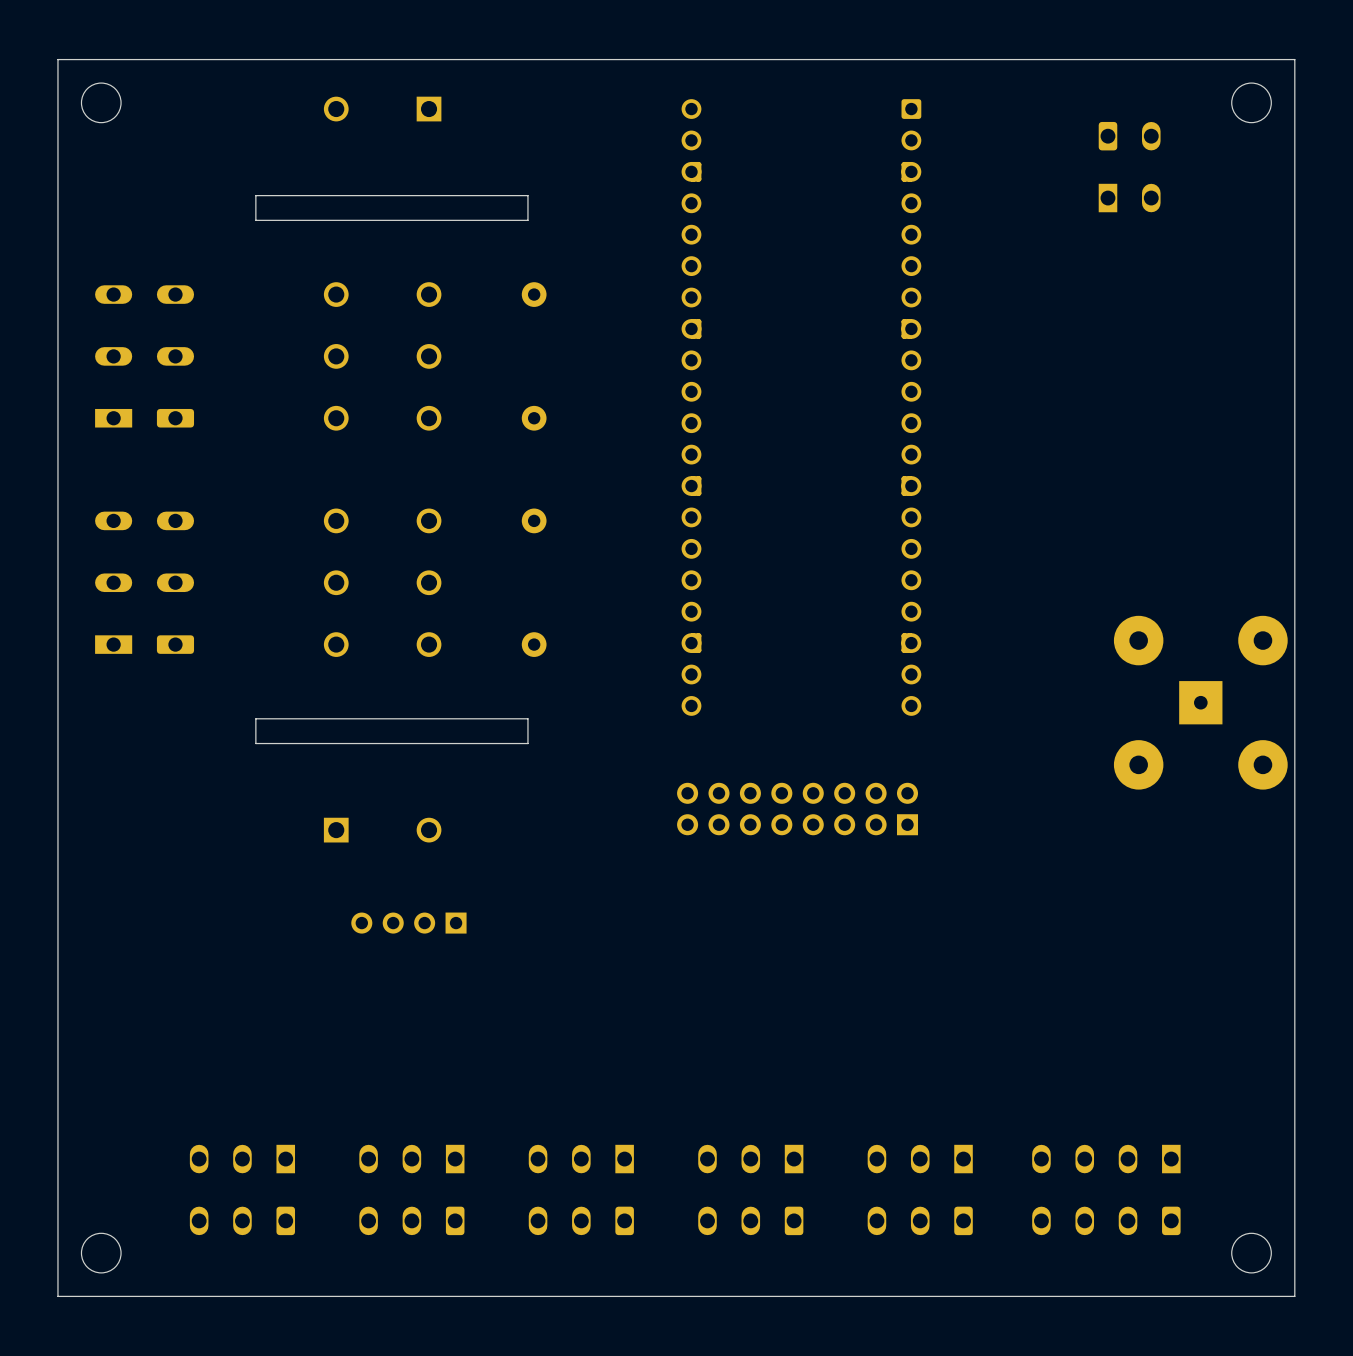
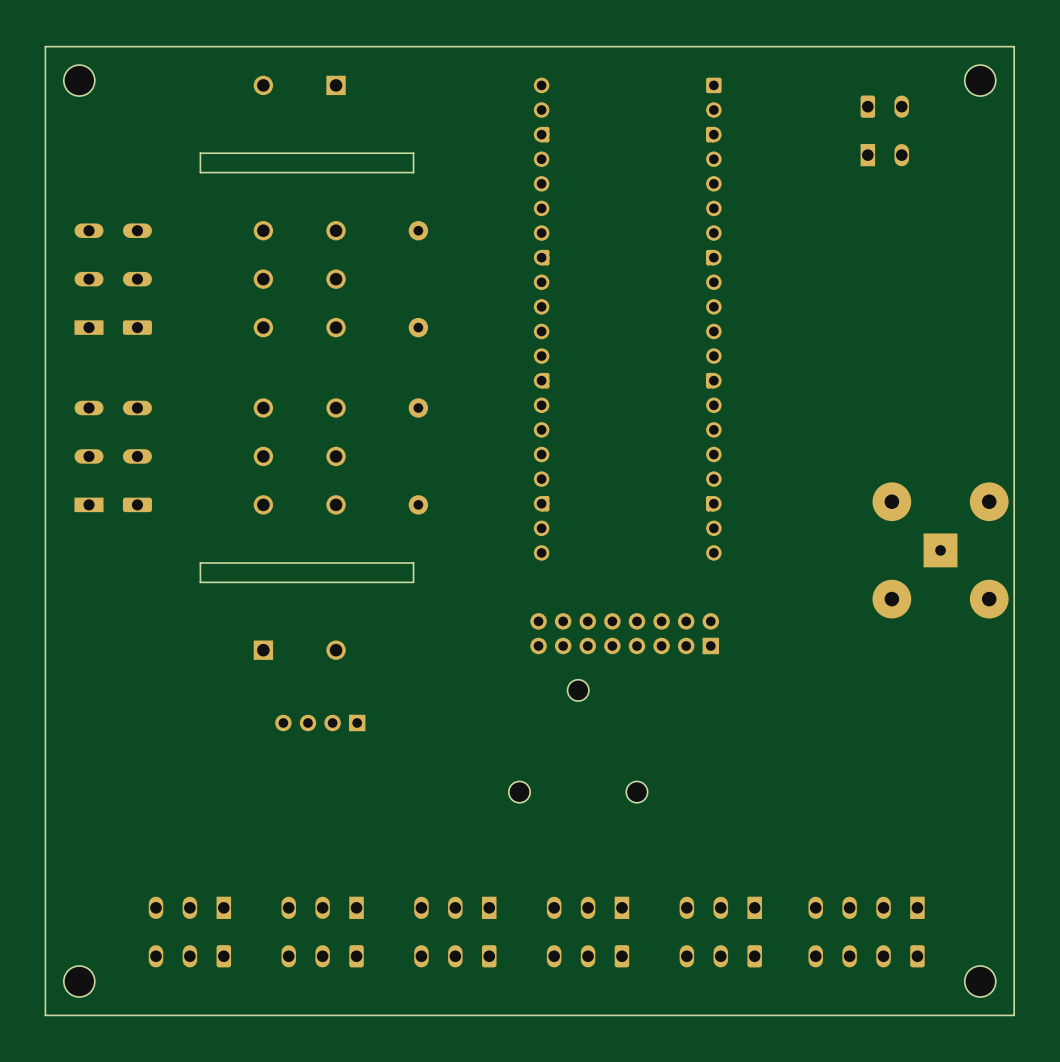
part: none -> (578, 690)
part: none -> (519, 792)
part: none -> (636, 792)

